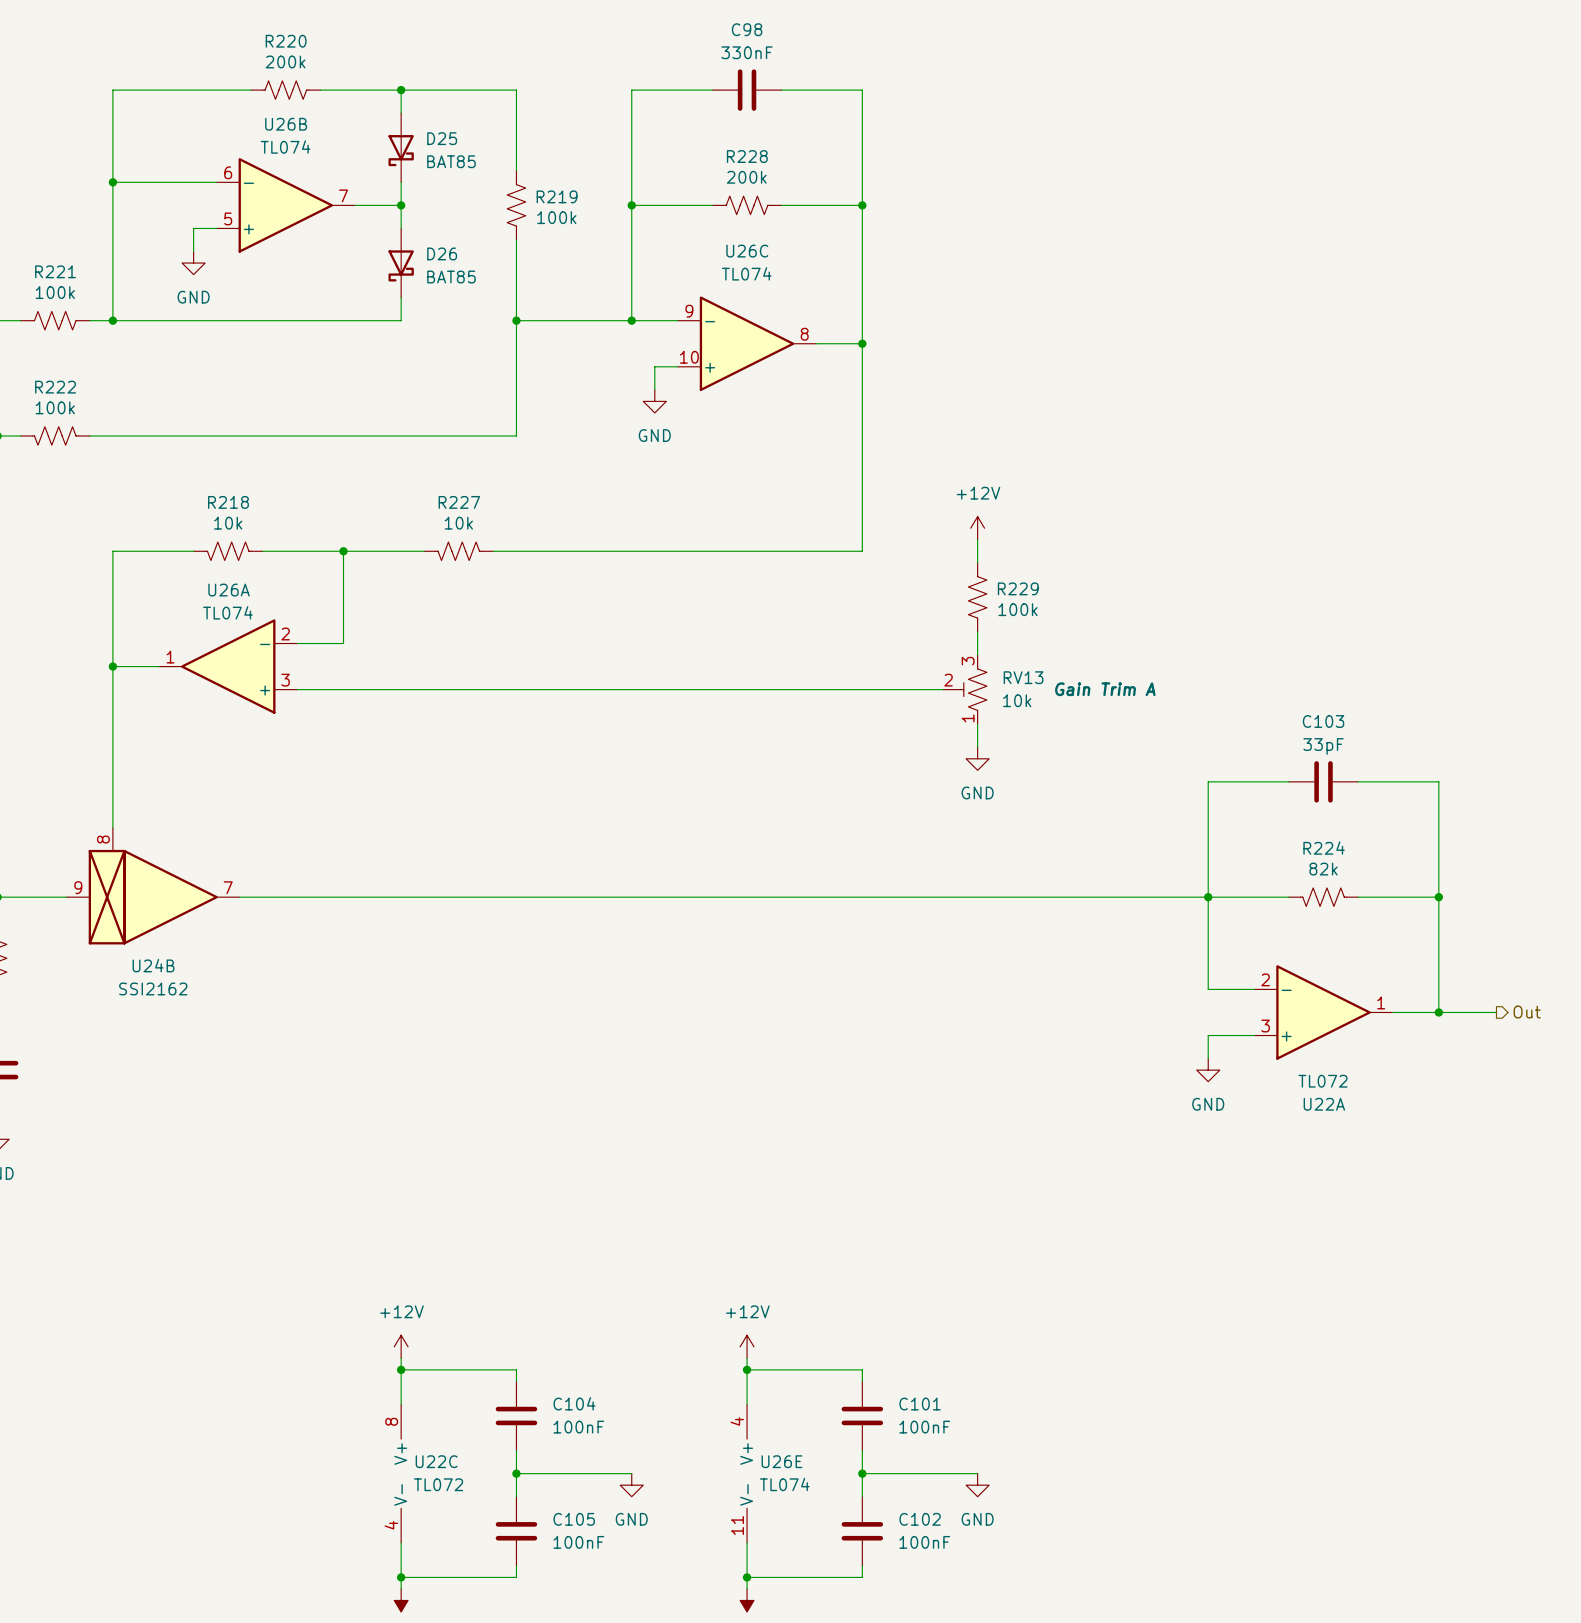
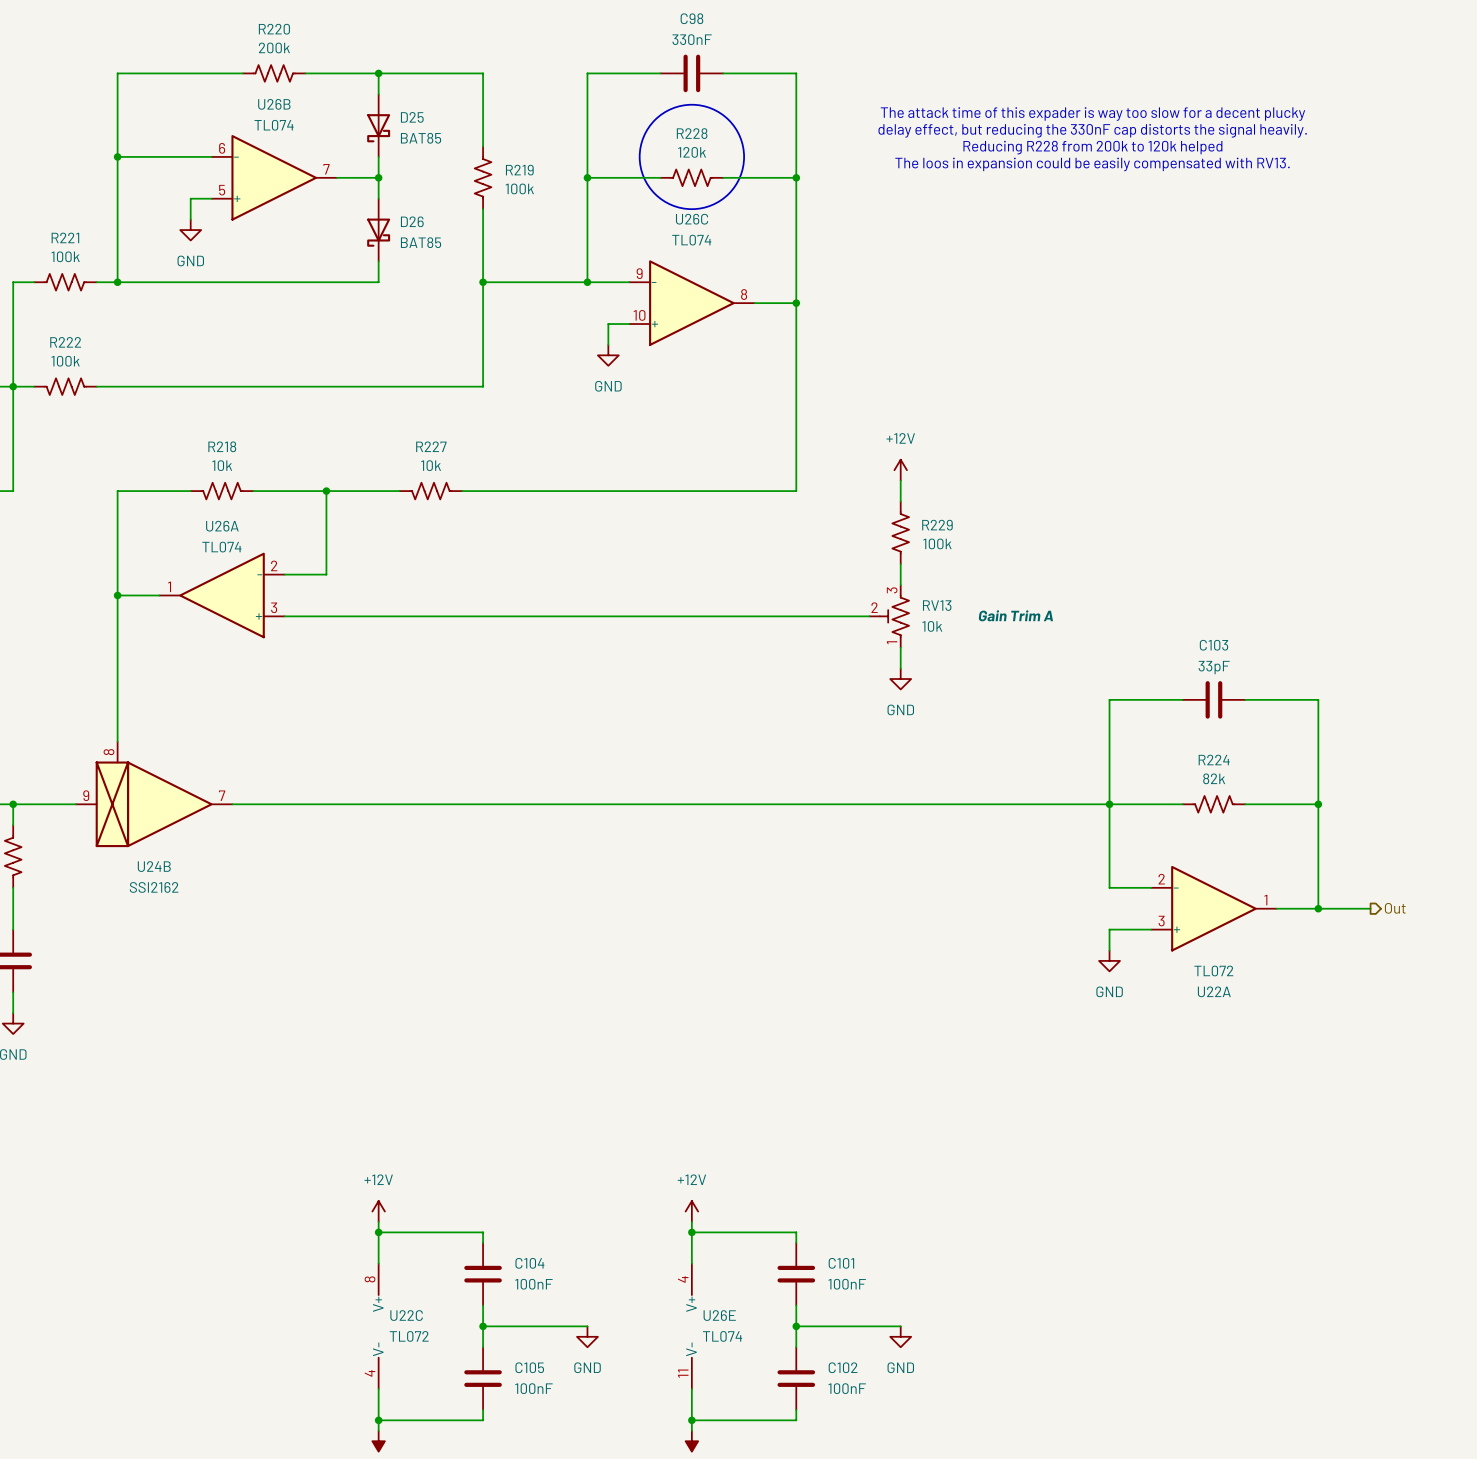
drawing: none -> [639, 104, 745, 210]
text: none -> The attack time of this expader is way too slow for a decent plucky (1092, 114)
text: none -> delay effect, but reducing the 330nF cap distorts the signal heavily. (1092, 130)
text: none -> Reducing R228 from 200k to 120k helped (1092, 147)
R228 value: 200k (746, 177) -> 120k (692, 152)
text: none -> The loos in expansion could be easily compensated with RV13. (1092, 164)

